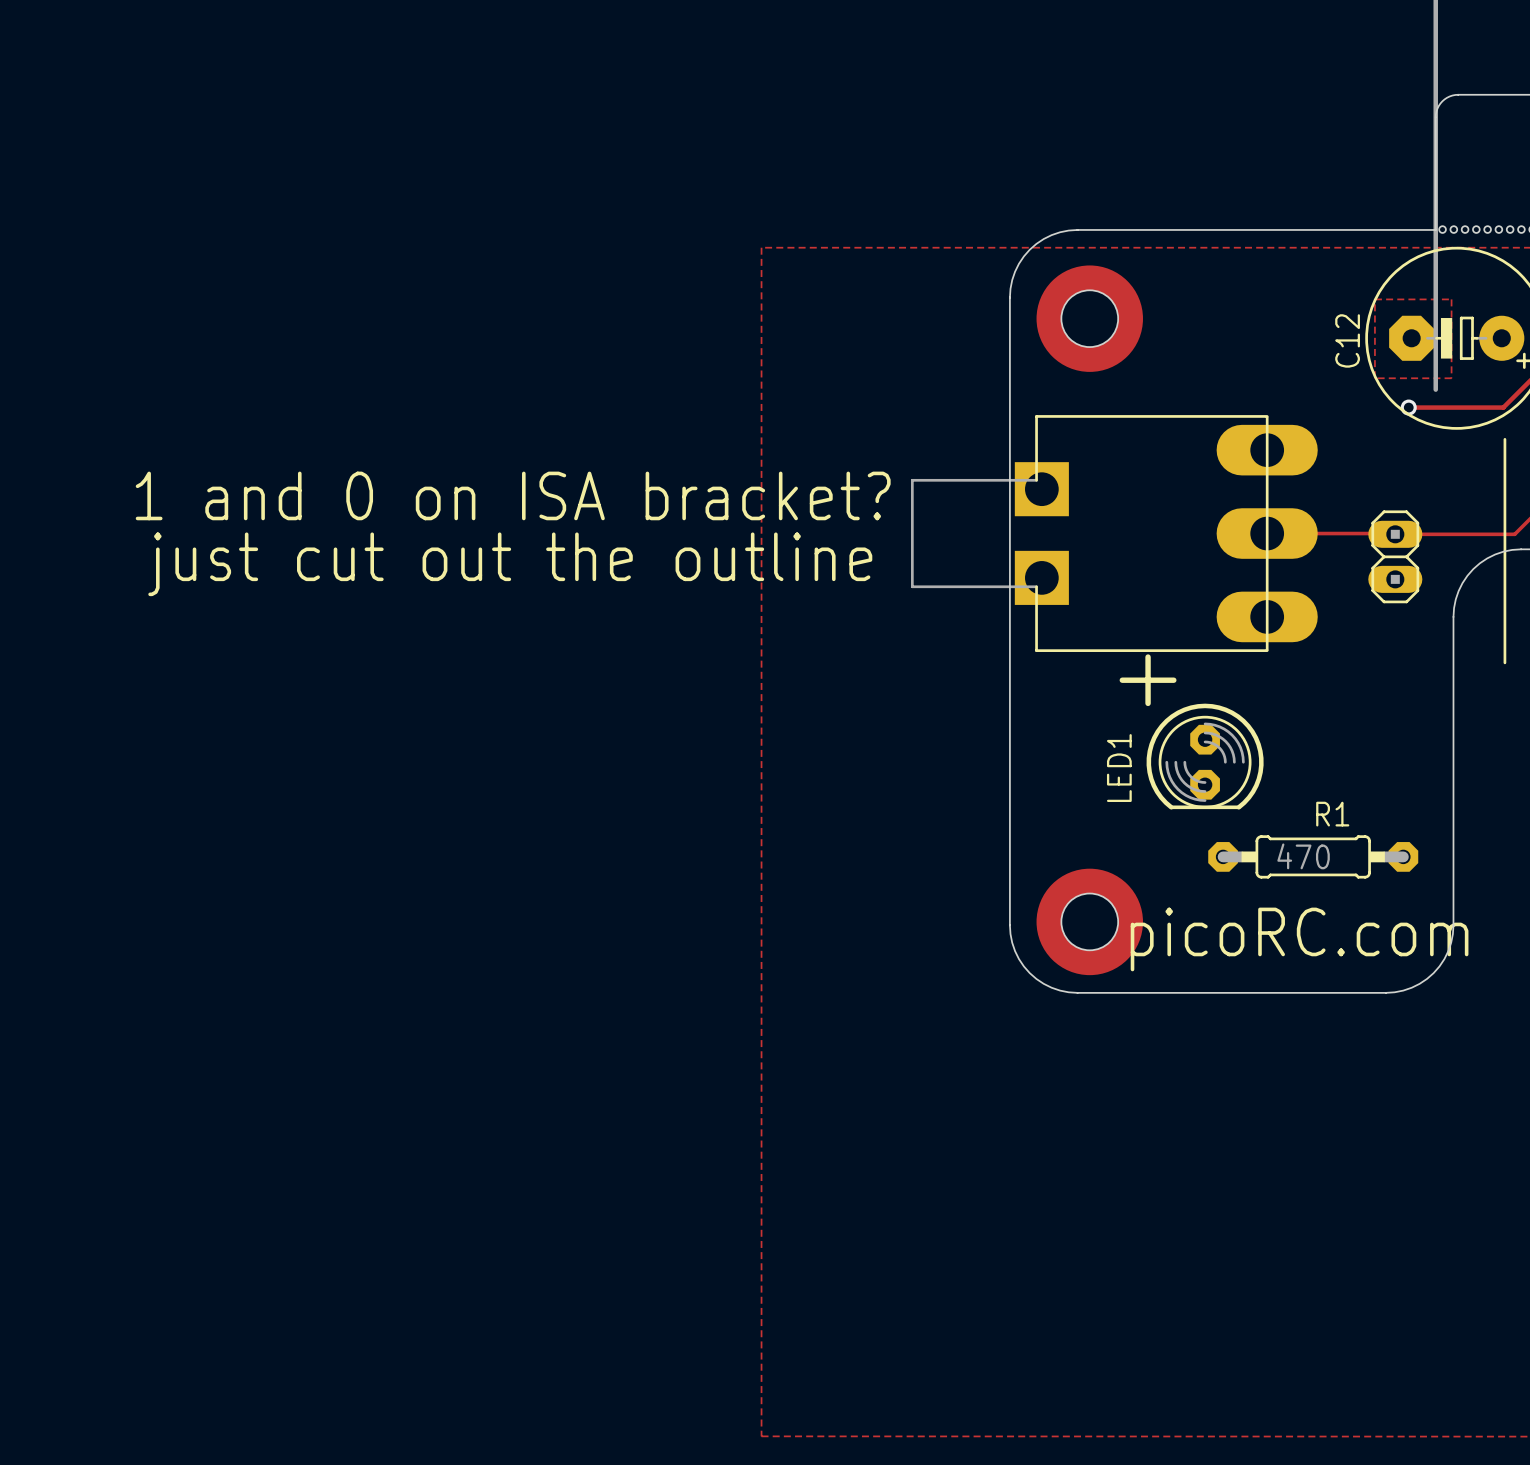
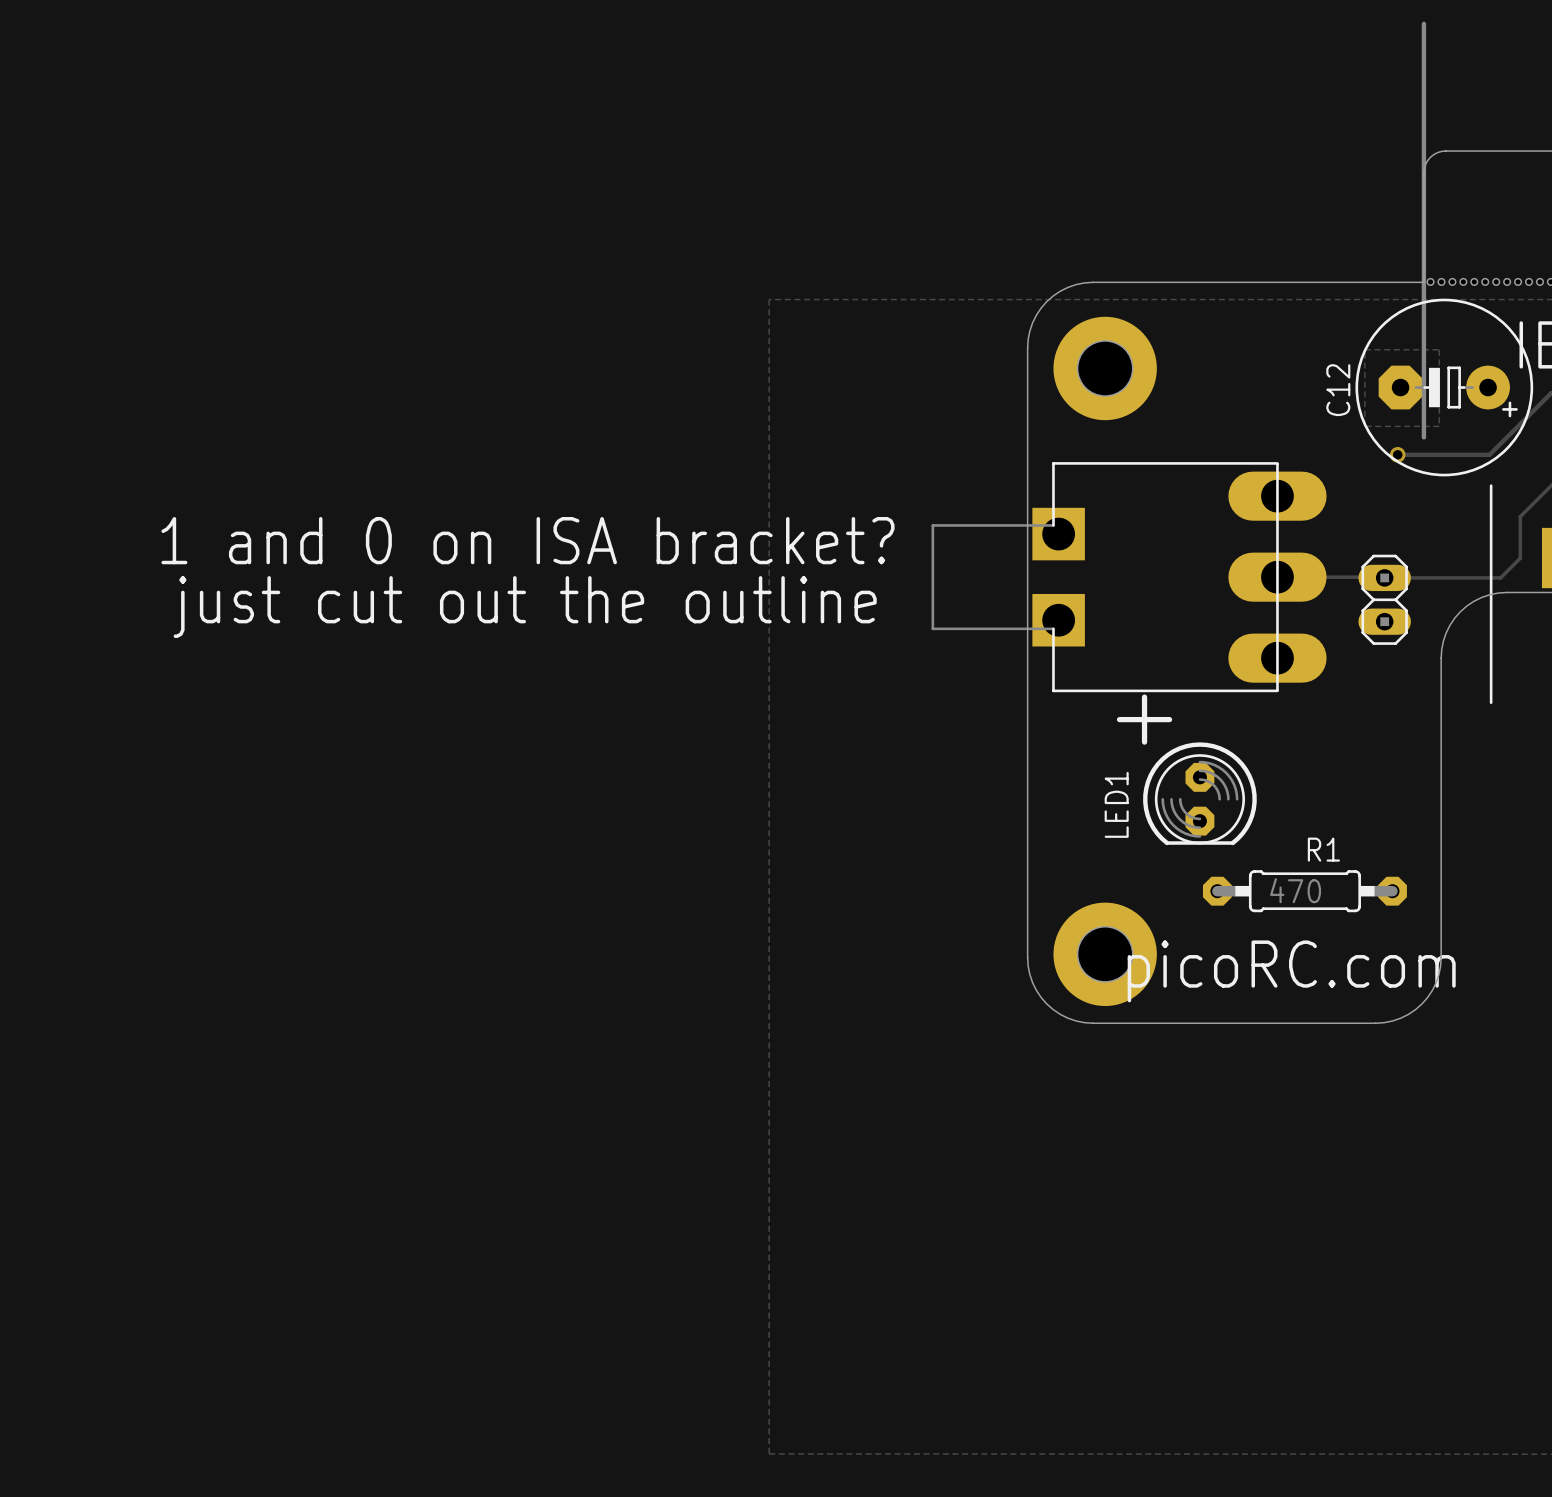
board edge: (1095, 229) (1060, 232) (1036, 243) (1018, 263) (1012, 280) (1009, 297) (1010, 934) (1018, 959) (1036, 978) (1060, 990) (1095, 992) -> (1093, 282) (1068, 287) (1046, 301) (1032, 322) (1027, 347) (1028, 966) (1036, 990) (1046, 1004) (1068, 1018) (1093, 1023)
part position: (1089, 318) -> (1105, 368)
part position: (1114, 533) -> (1129, 577)
part position: (1089, 921) -> (1105, 954)

